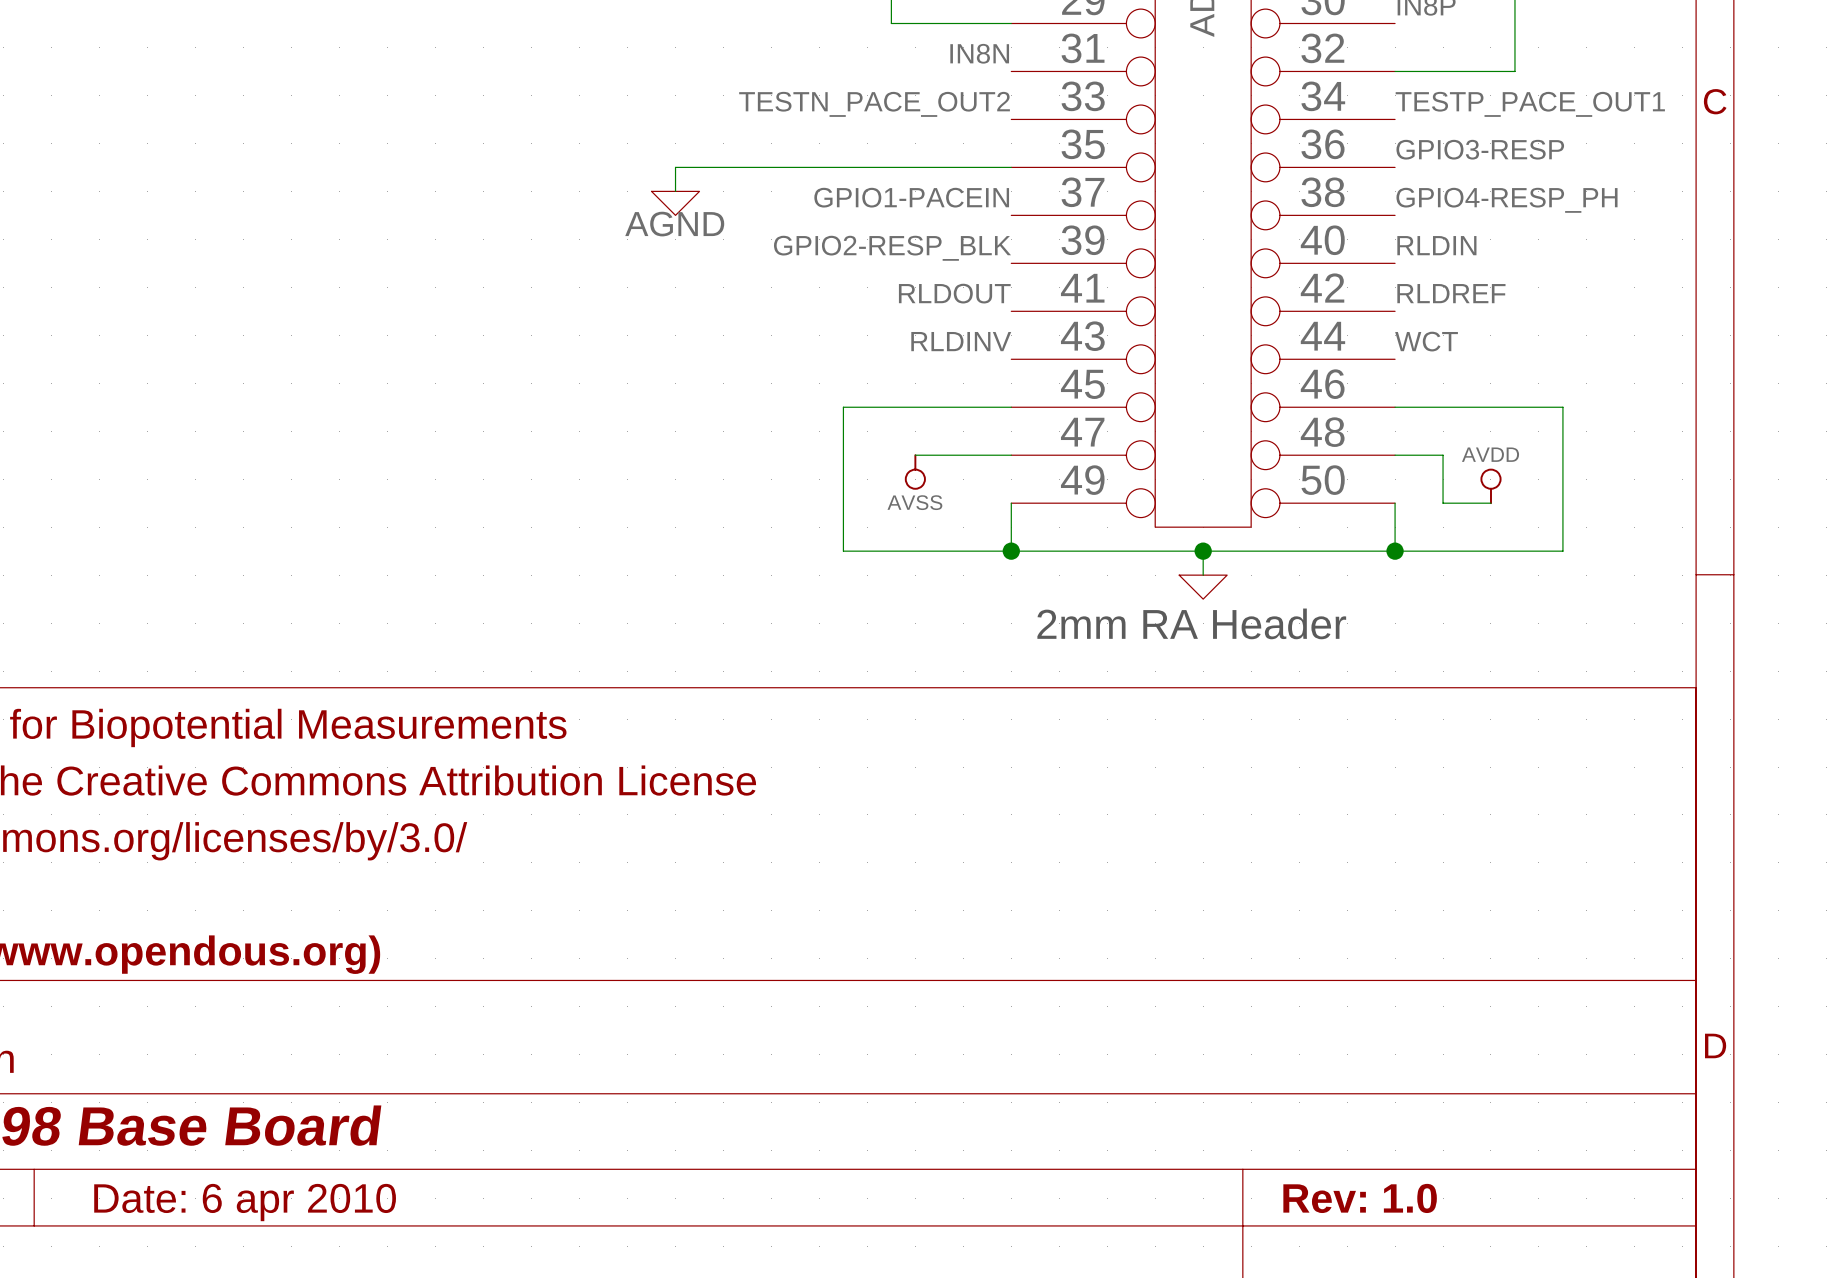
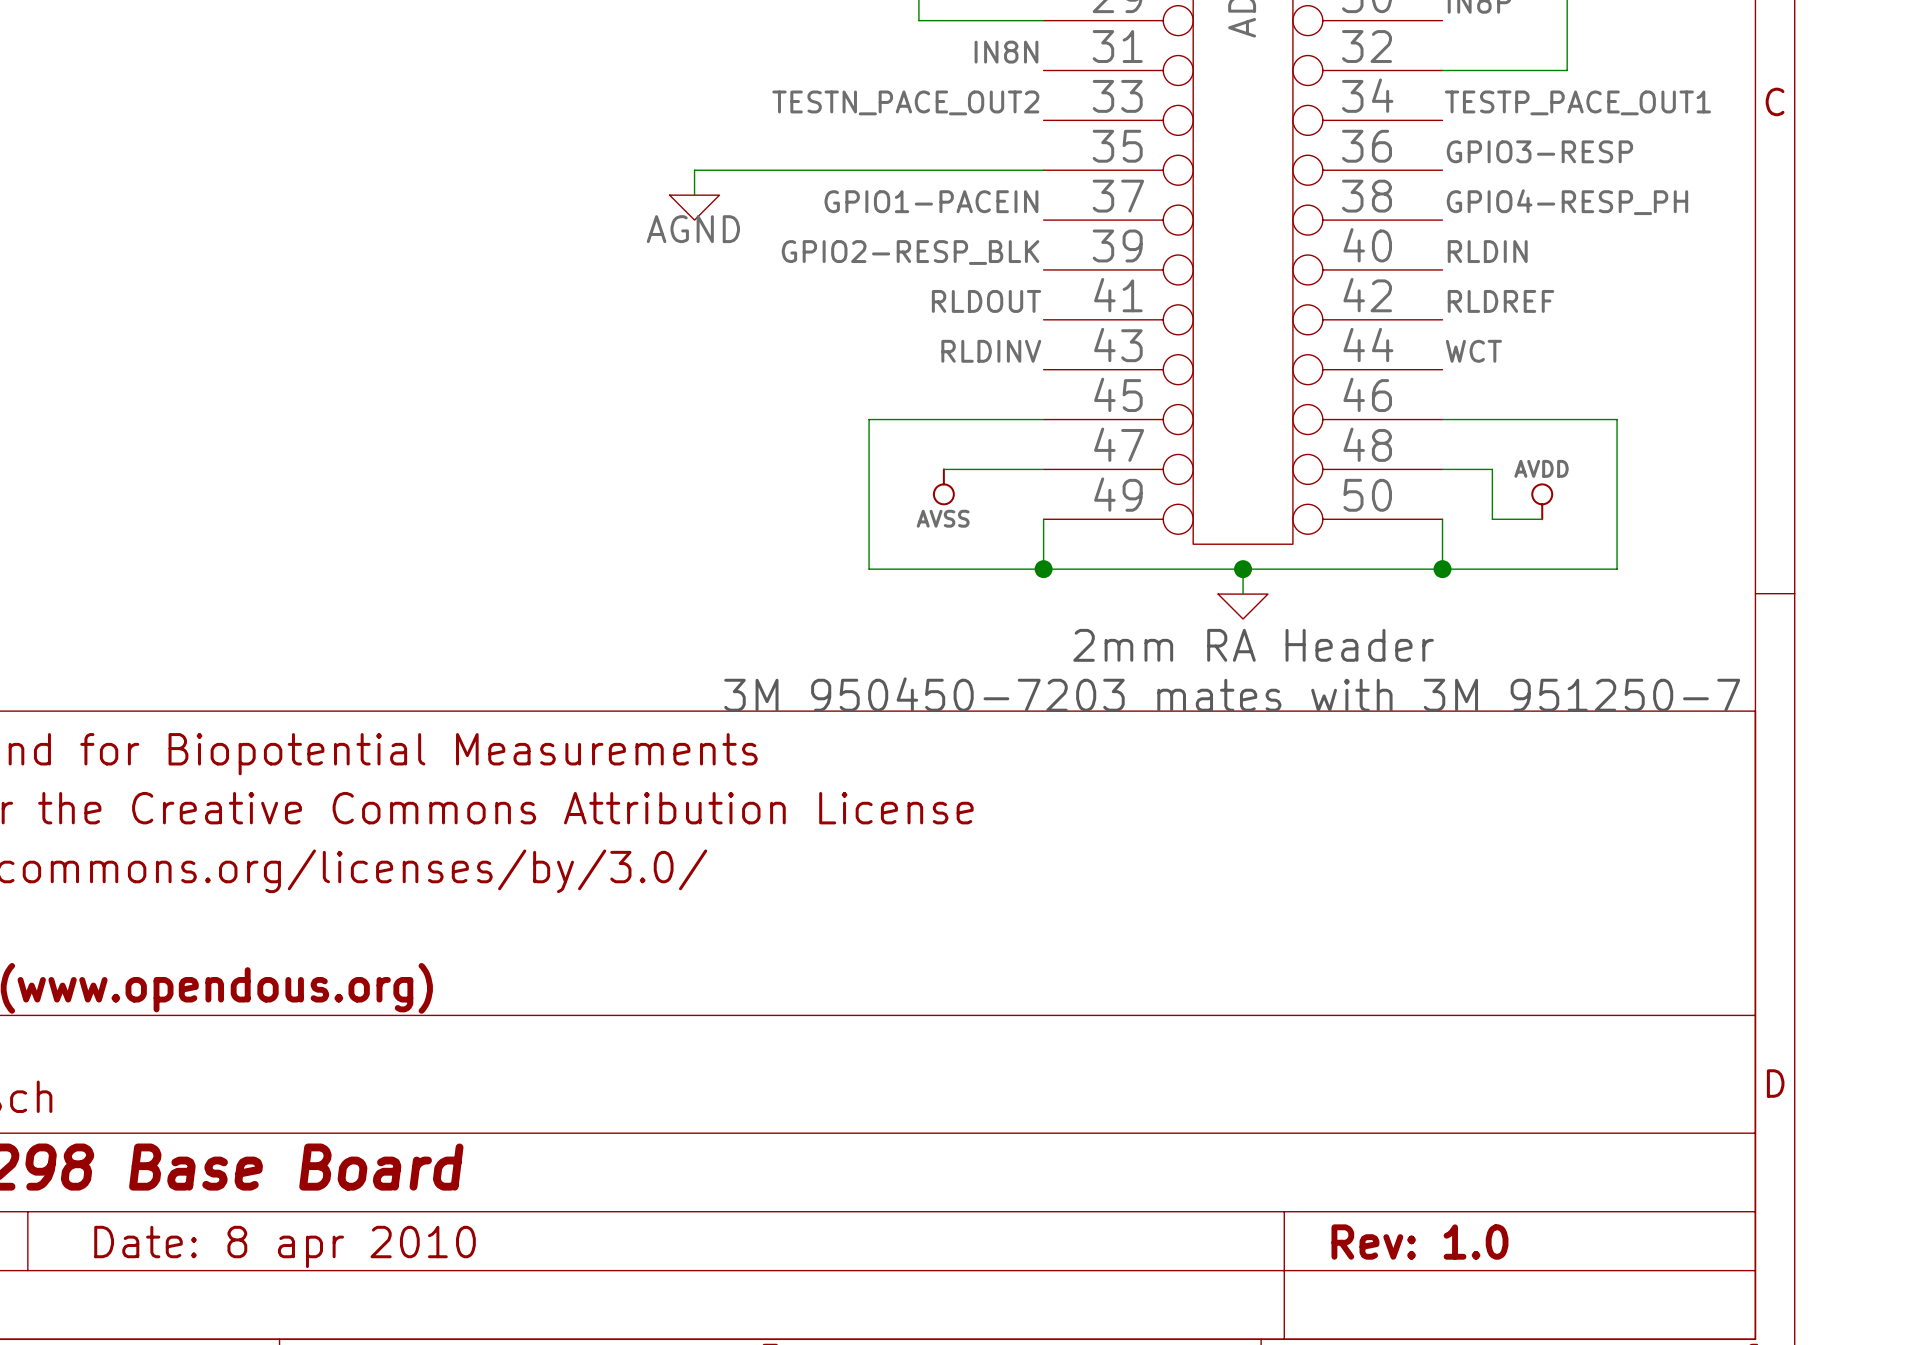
text: none -> 3M 950450-7203 mates with 3M 951250-7 (1232, 694)
title block: Date: 6 apr 2010 (245, 1202) -> Date: 8 apr 2010 (285, 1246)

